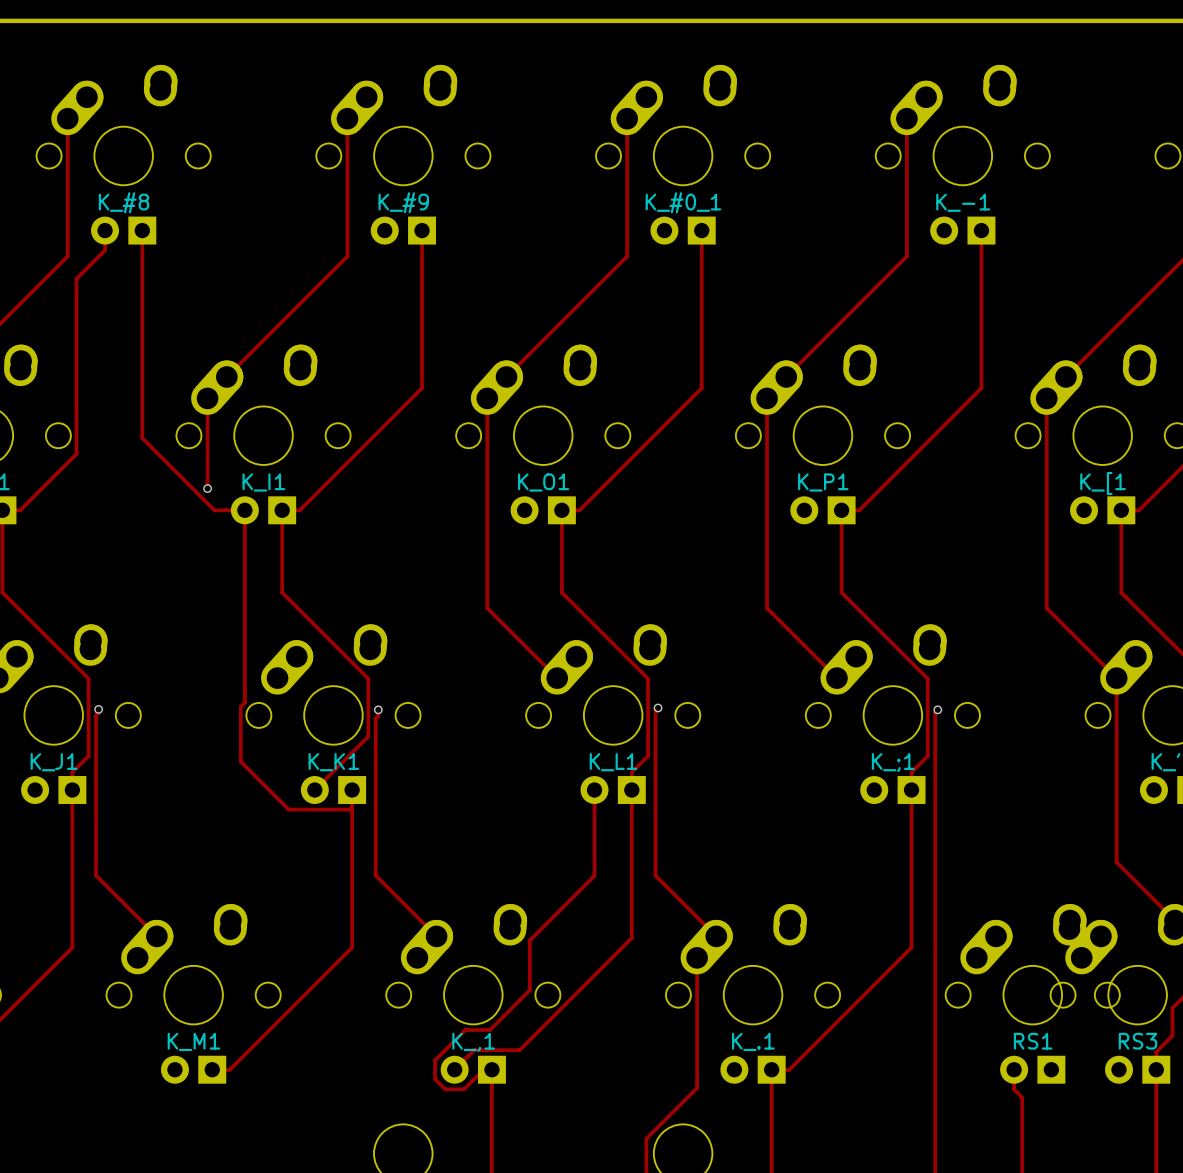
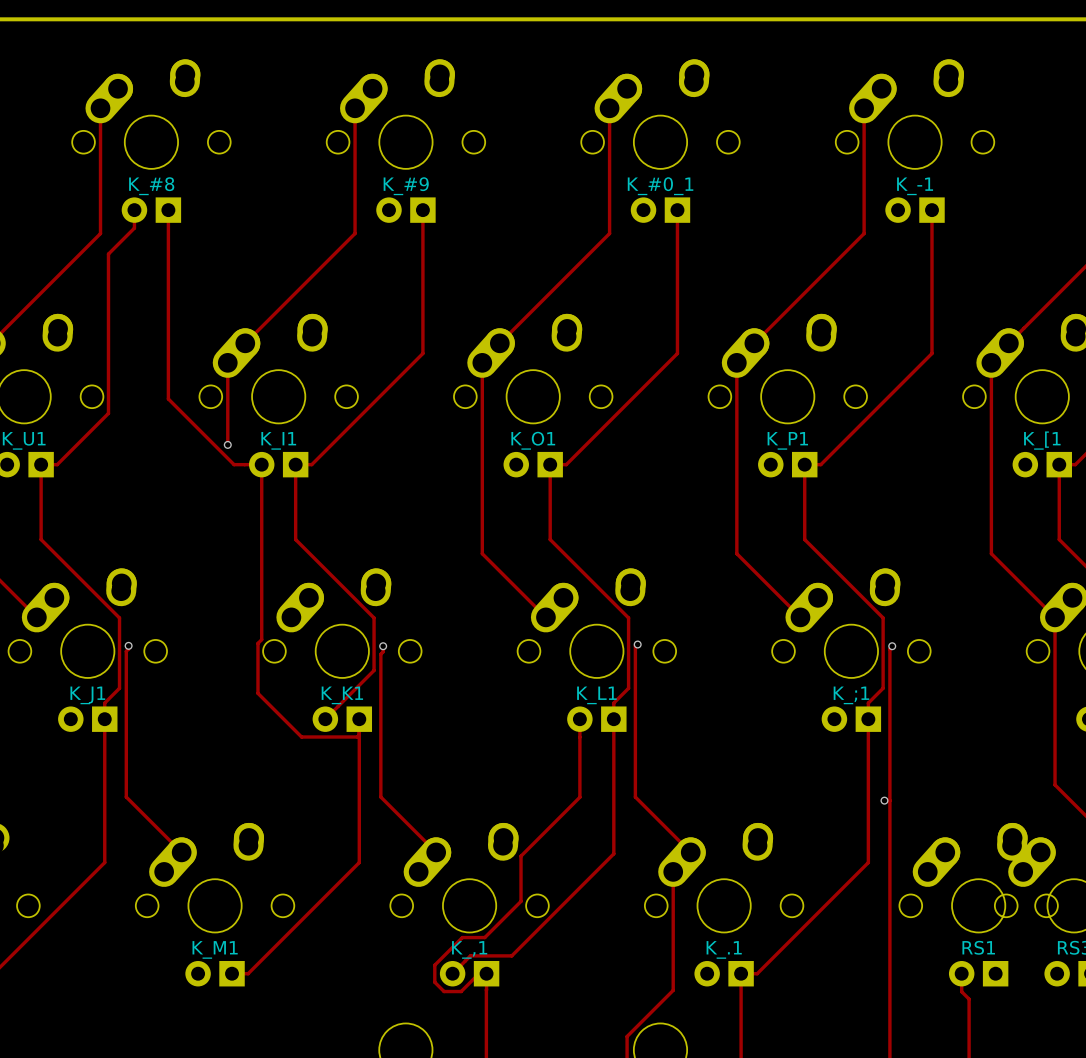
via: none -> (884, 800)

